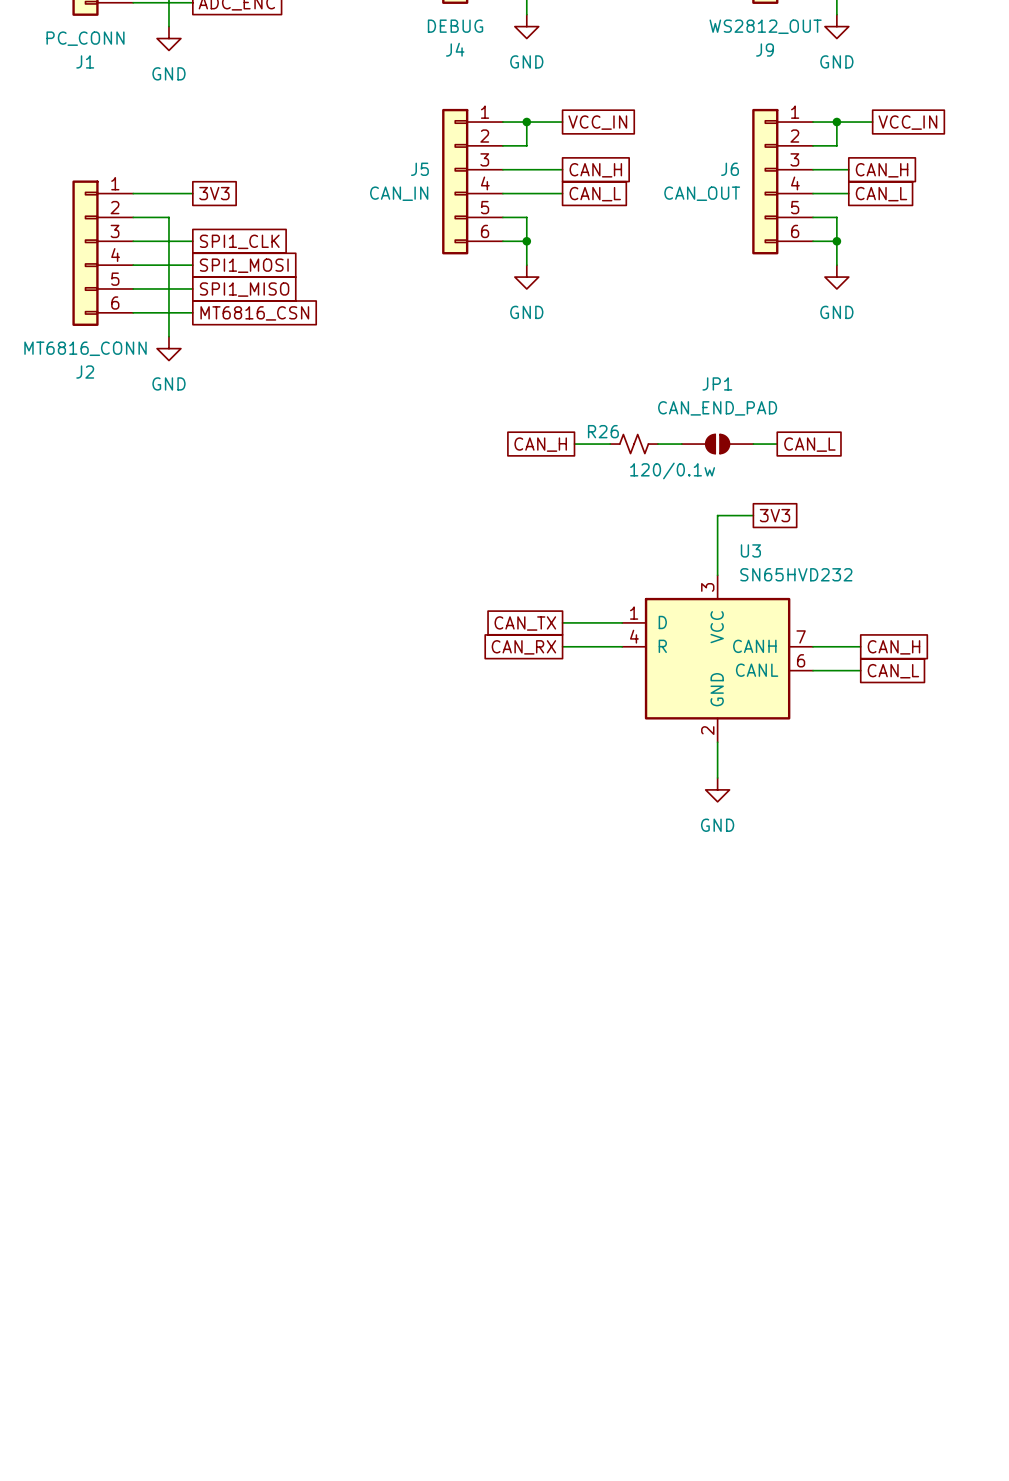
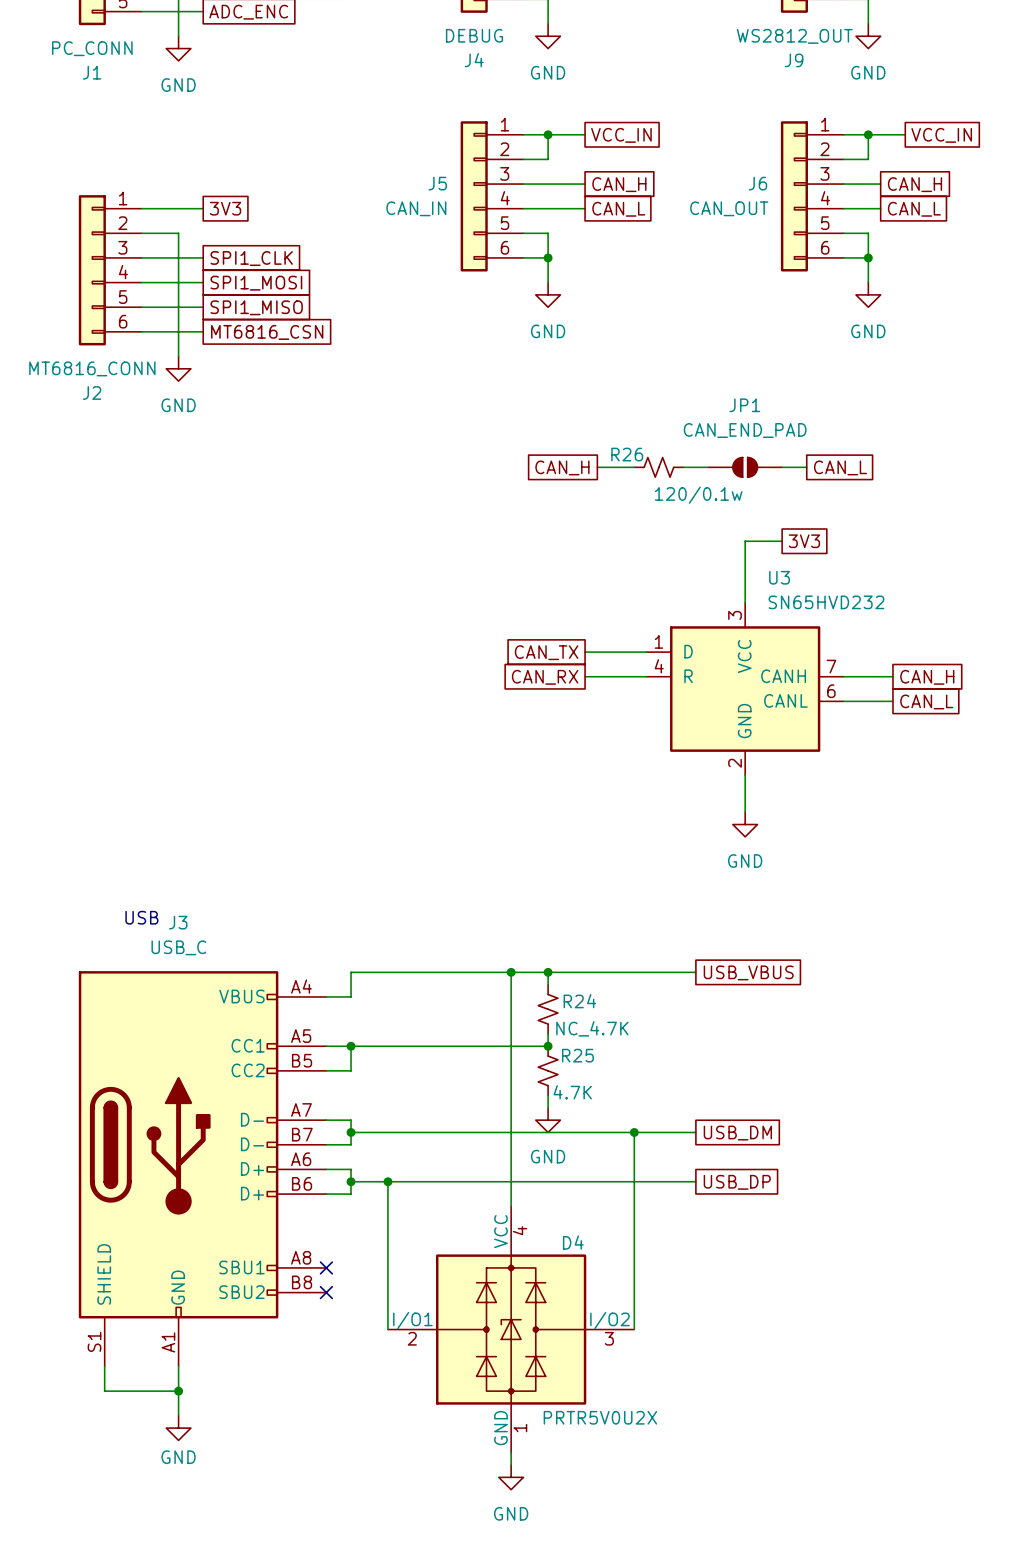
text: none -> USB (141, 917)
wire: none -> (511, 972) (511, 1206)
junction: none -> (511, 972)
wire: none -> (548, 972) (548, 984)
junction: none -> (548, 972)
wire: none -> (695, 972) (351, 972) (351, 996) (326, 996)
global label: none -> USB_VBUS (748, 972)
R24: none -> NC_4.7K (548, 1009)
wire: none -> (548, 1033) (548, 1046) (326, 1046)
wire: none -> (351, 1046) (351, 1070) (326, 1070)
junction: none -> (351, 1046)
junction: none -> (548, 1046)
R25: none -> 4.7K (548, 1070)
wire: none -> (548, 1095) (548, 1107)
wire: none -> (326, 1120) (351, 1120) (351, 1144) (326, 1144)
power symbol: none -> GND (548, 1120)
wire: none -> (351, 1132) (695, 1132)
junction: none -> (351, 1132)
wire: none -> (634, 1132) (634, 1329)
junction: none -> (634, 1132)
global label: none -> USB_DM (737, 1133)
J3: none -> USB_C (202, 1168)
wire: none -> (326, 1169) (351, 1169) (351, 1194) (326, 1194)
wire: none -> (351, 1181) (695, 1181)
junction: none -> (351, 1181)
wire: none -> (387, 1181) (387, 1329)
junction: none -> (387, 1181)
global label: none -> USB_DP (737, 1182)
no-connect mark: none -> (326, 1267)
no-connect mark: none -> (326, 1292)
D4: none -> PRTR5V0U2X (511, 1329)
wire: none -> (104, 1366) (104, 1391) (178, 1391)
wire: none -> (178, 1366) (178, 1415)
junction: none -> (178, 1391)
power symbol: none -> GND (178, 1428)
wire: none -> (511, 1452) (511, 1465)
power symbol: none -> GND (511, 1477)

